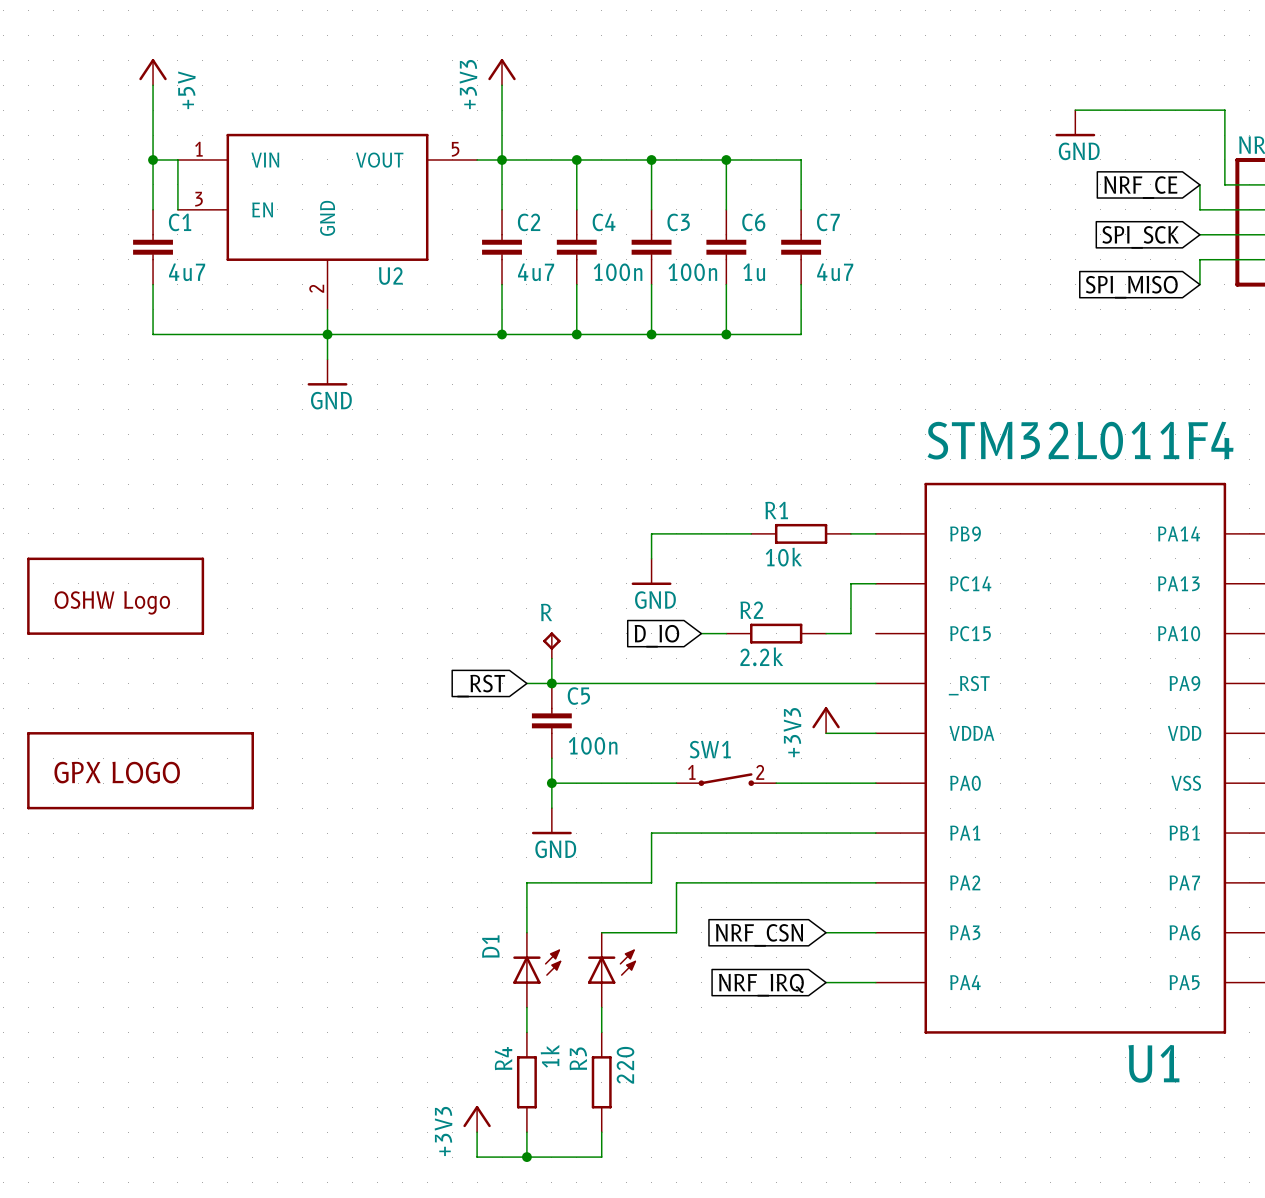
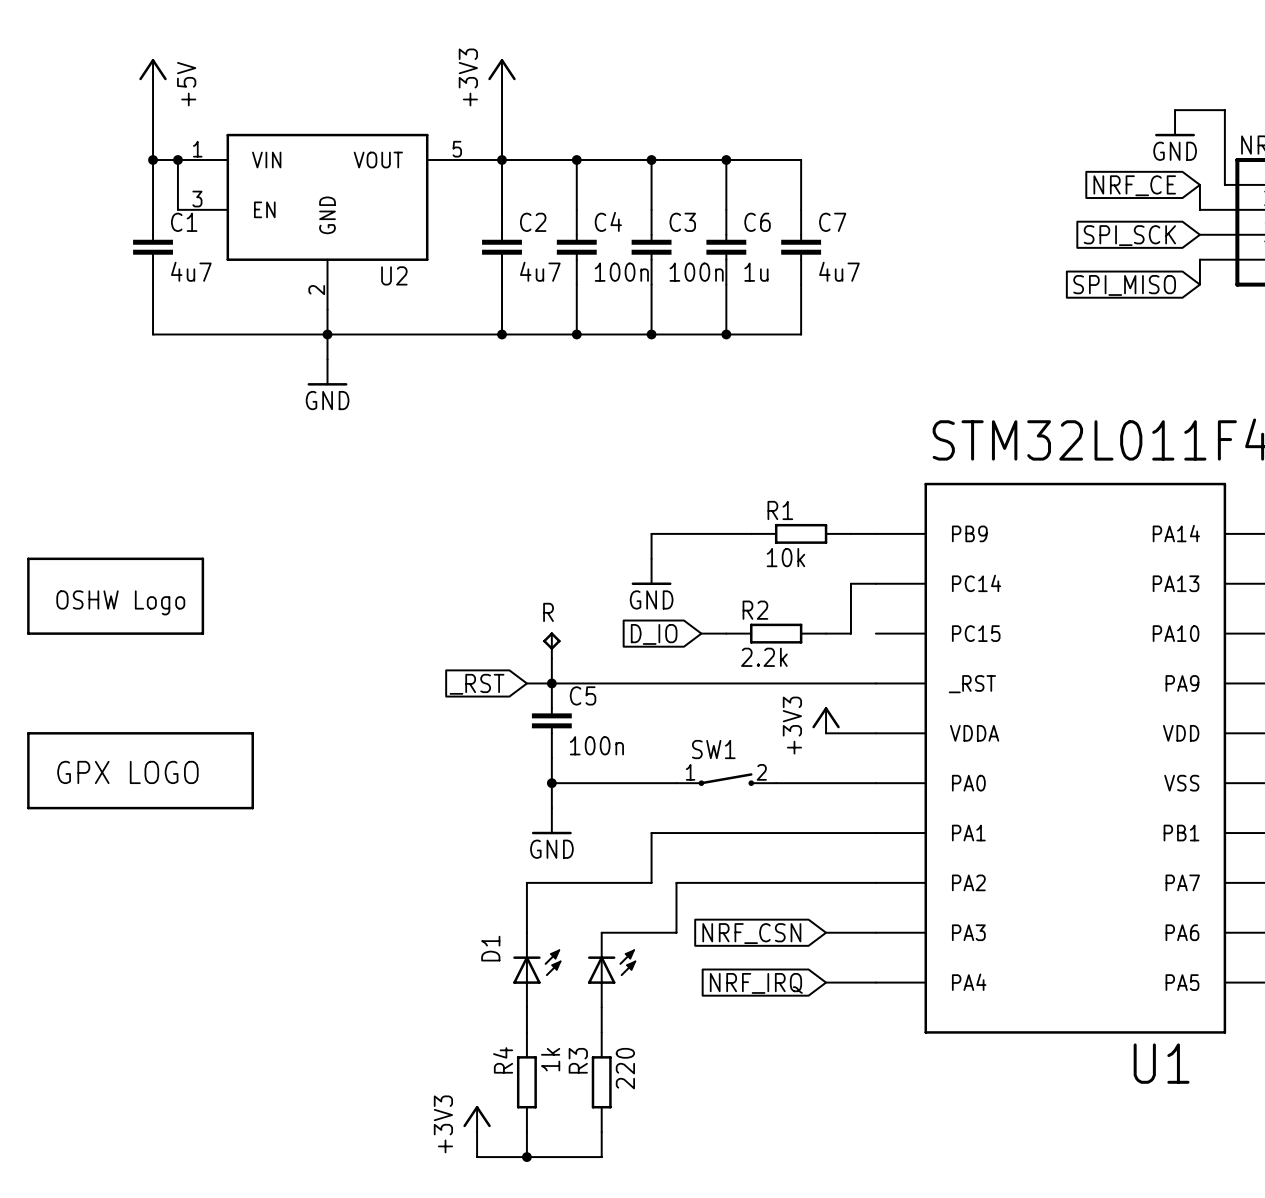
wire: (1075, 110) (1175, 110) -> none
power symbol position: GND (1075, 123) -> GND (1175, 123)
junction: none -> (177, 159)

